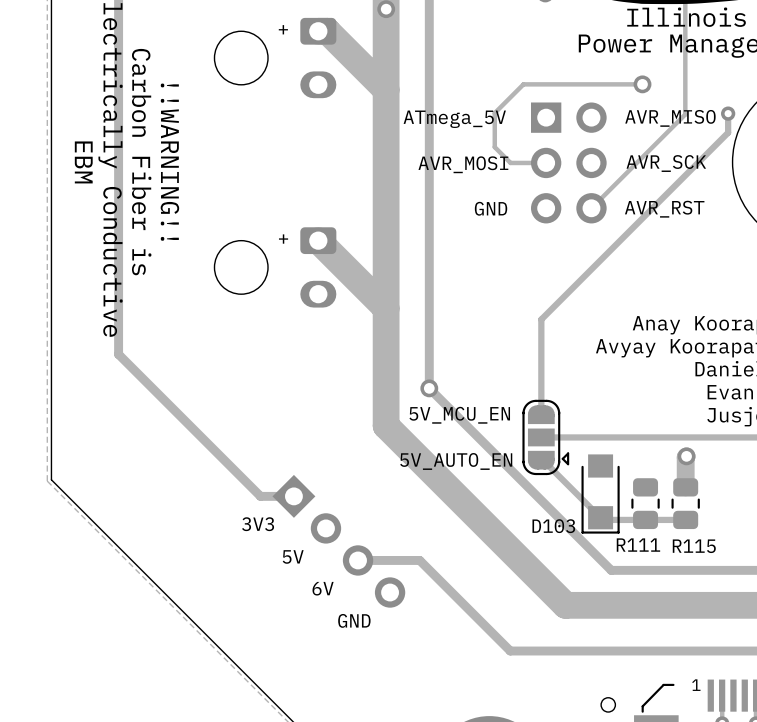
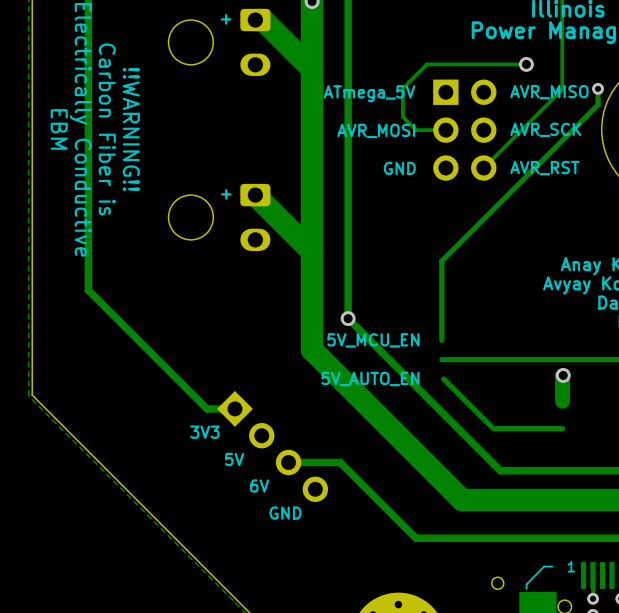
part: (545, 437) -> none
D103: (600, 494) -> none
R111: (645, 503) -> none
R115: (685, 503) -> none

